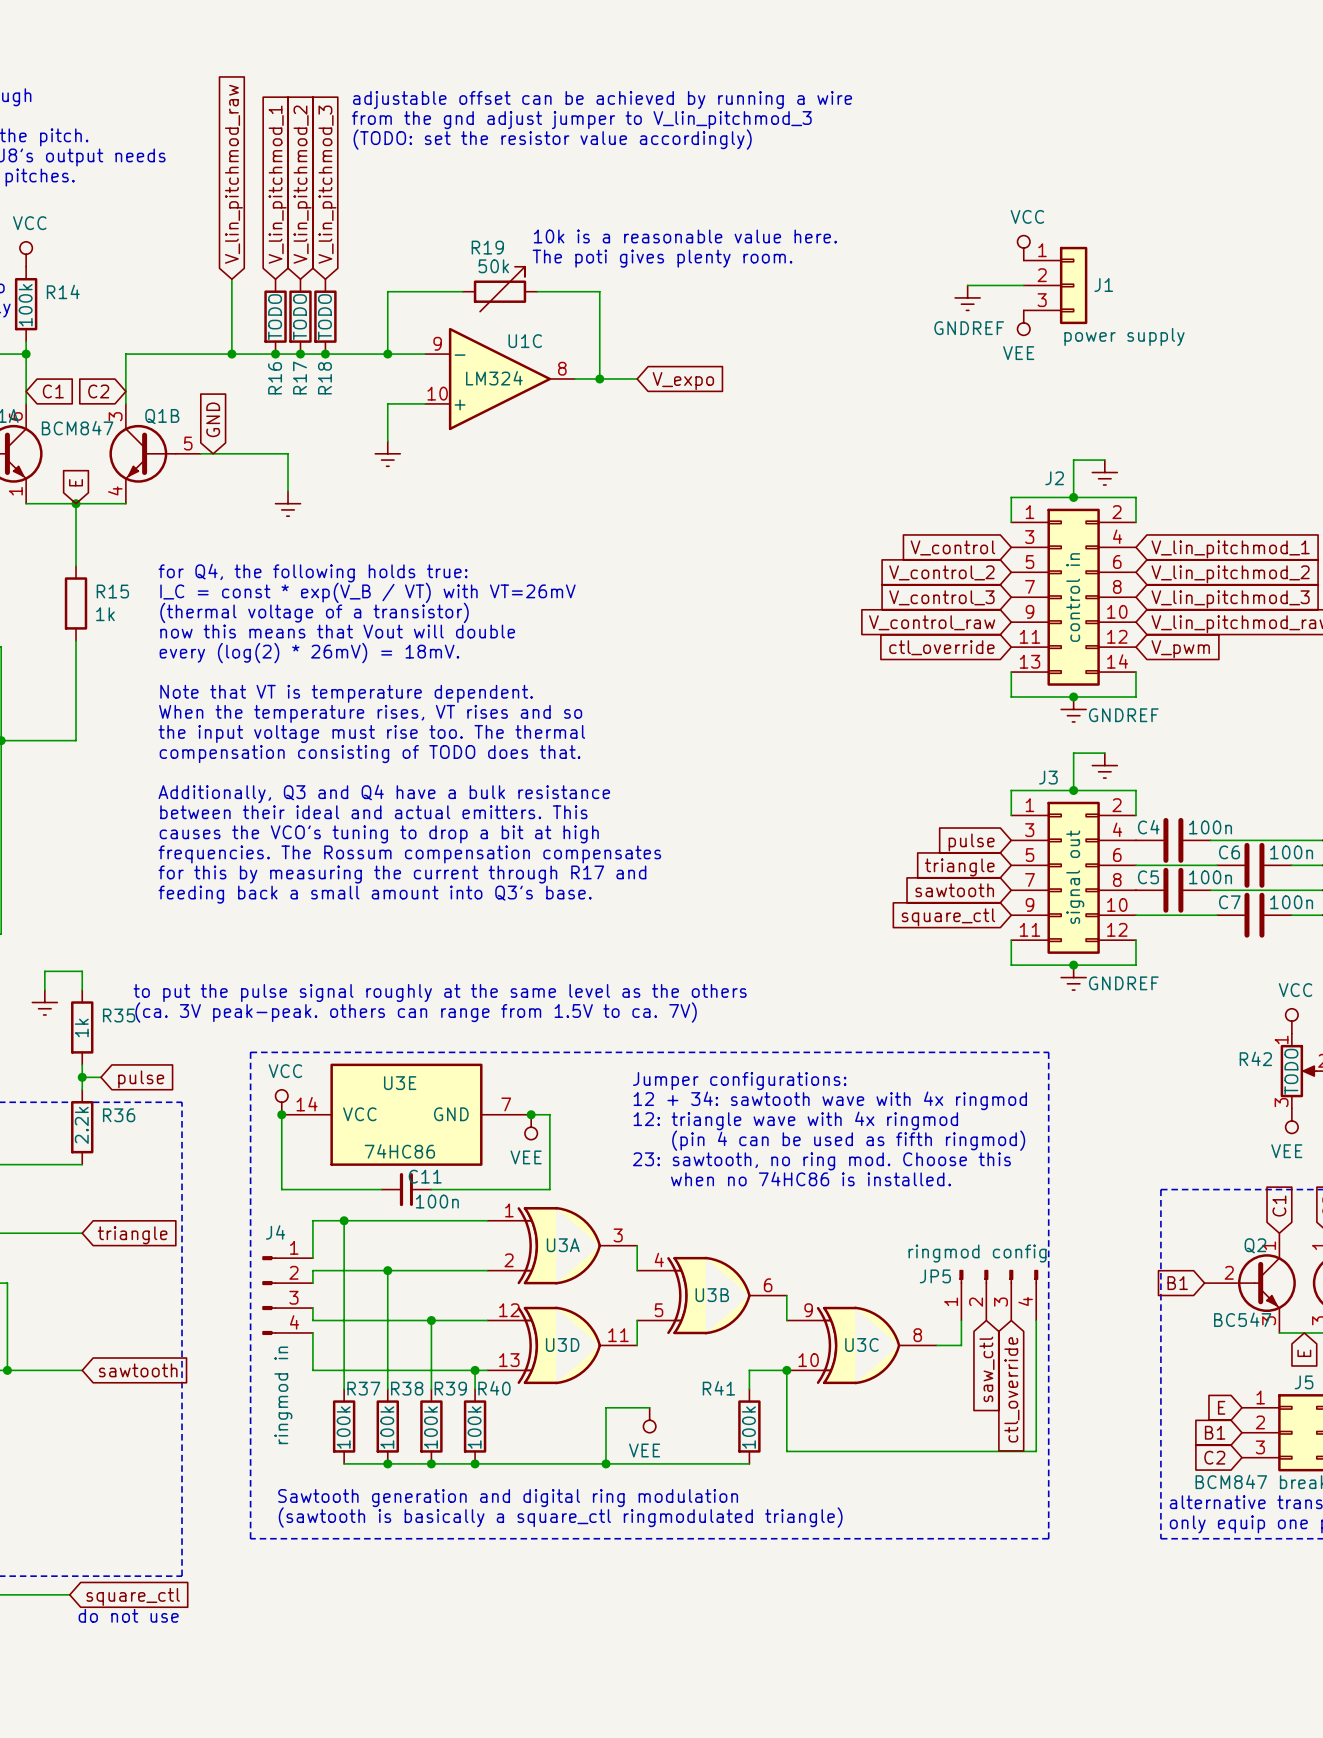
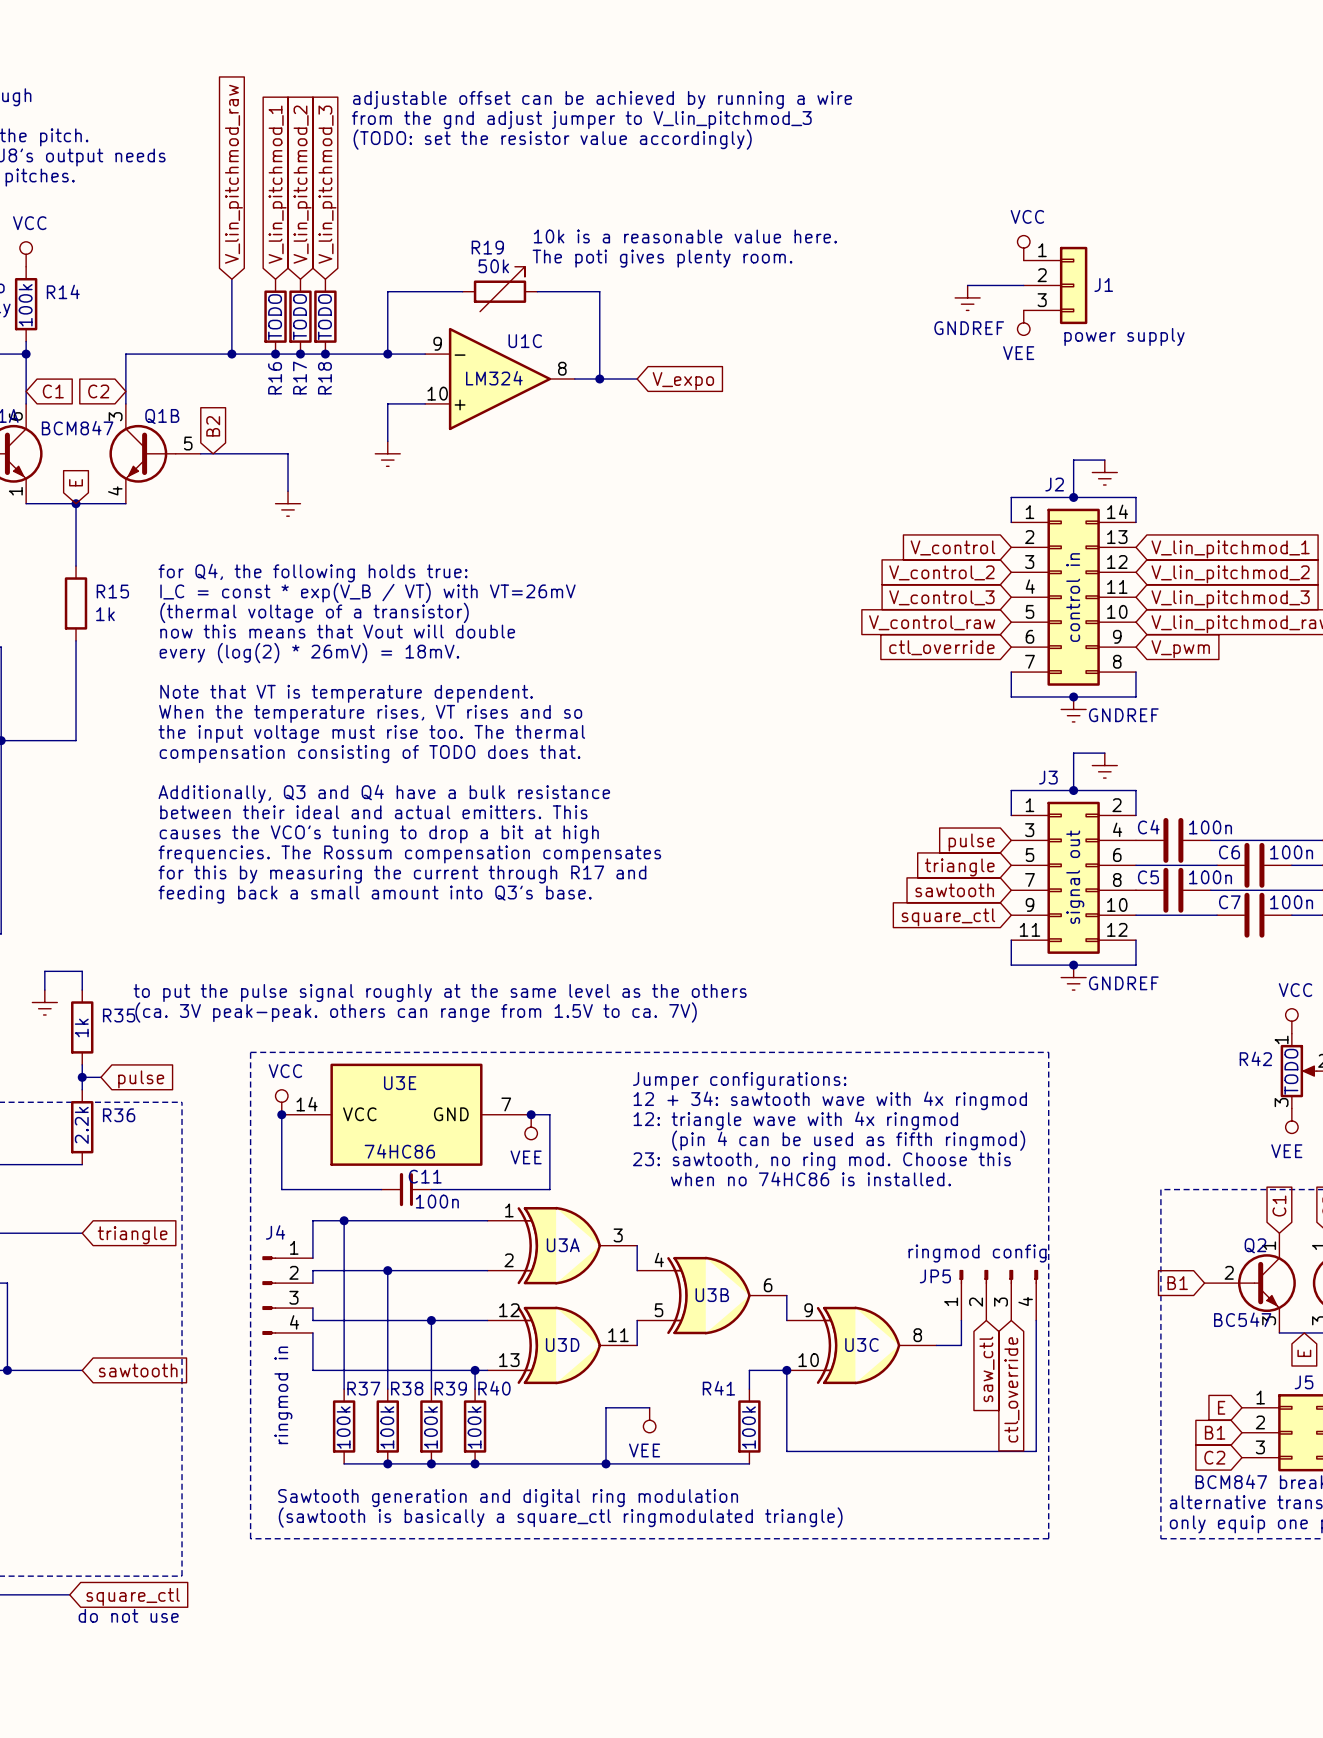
global label: GND (213, 419) -> B2 (213, 426)
J2 symbol: [1011, 508, 1136, 686] -> [1011, 508, 1136, 686]

